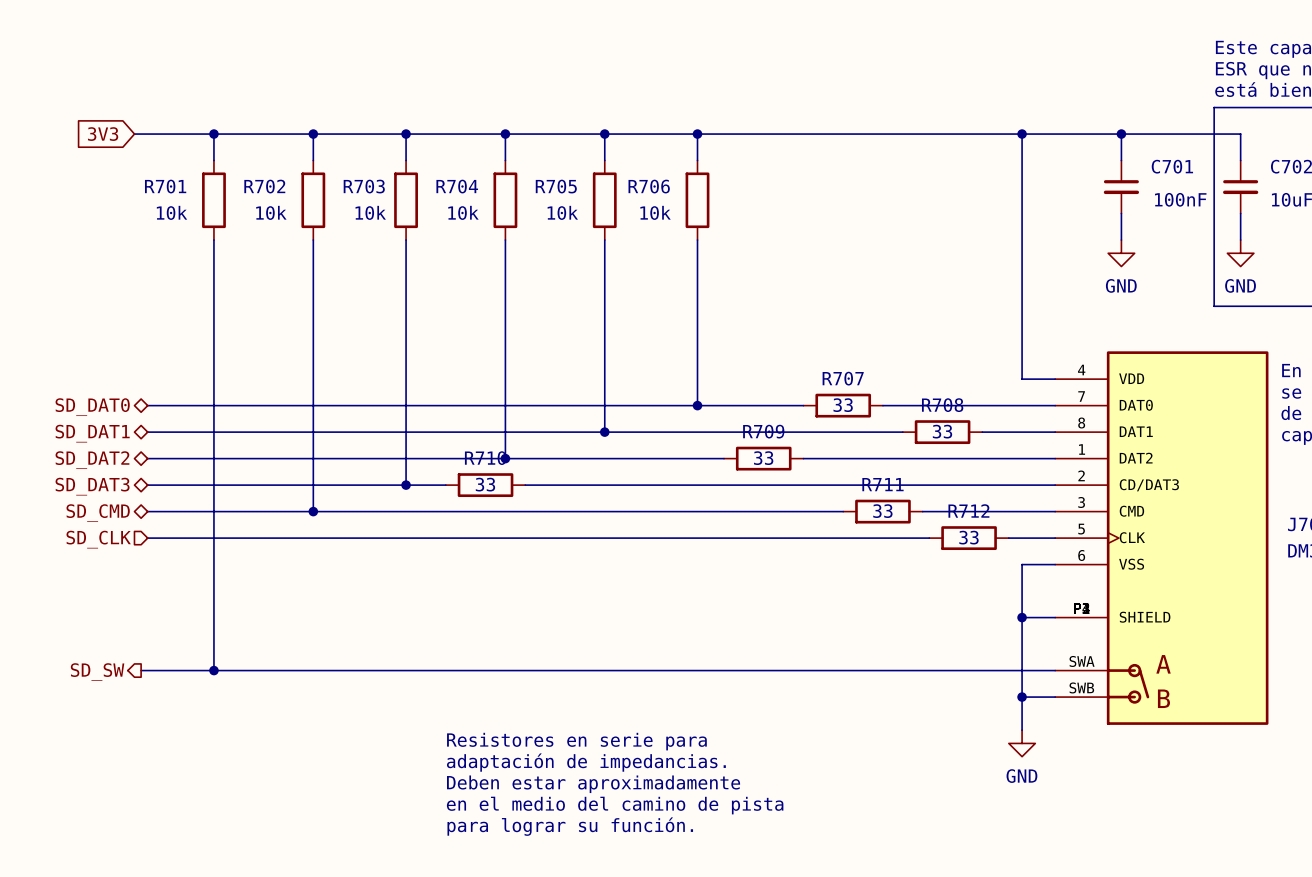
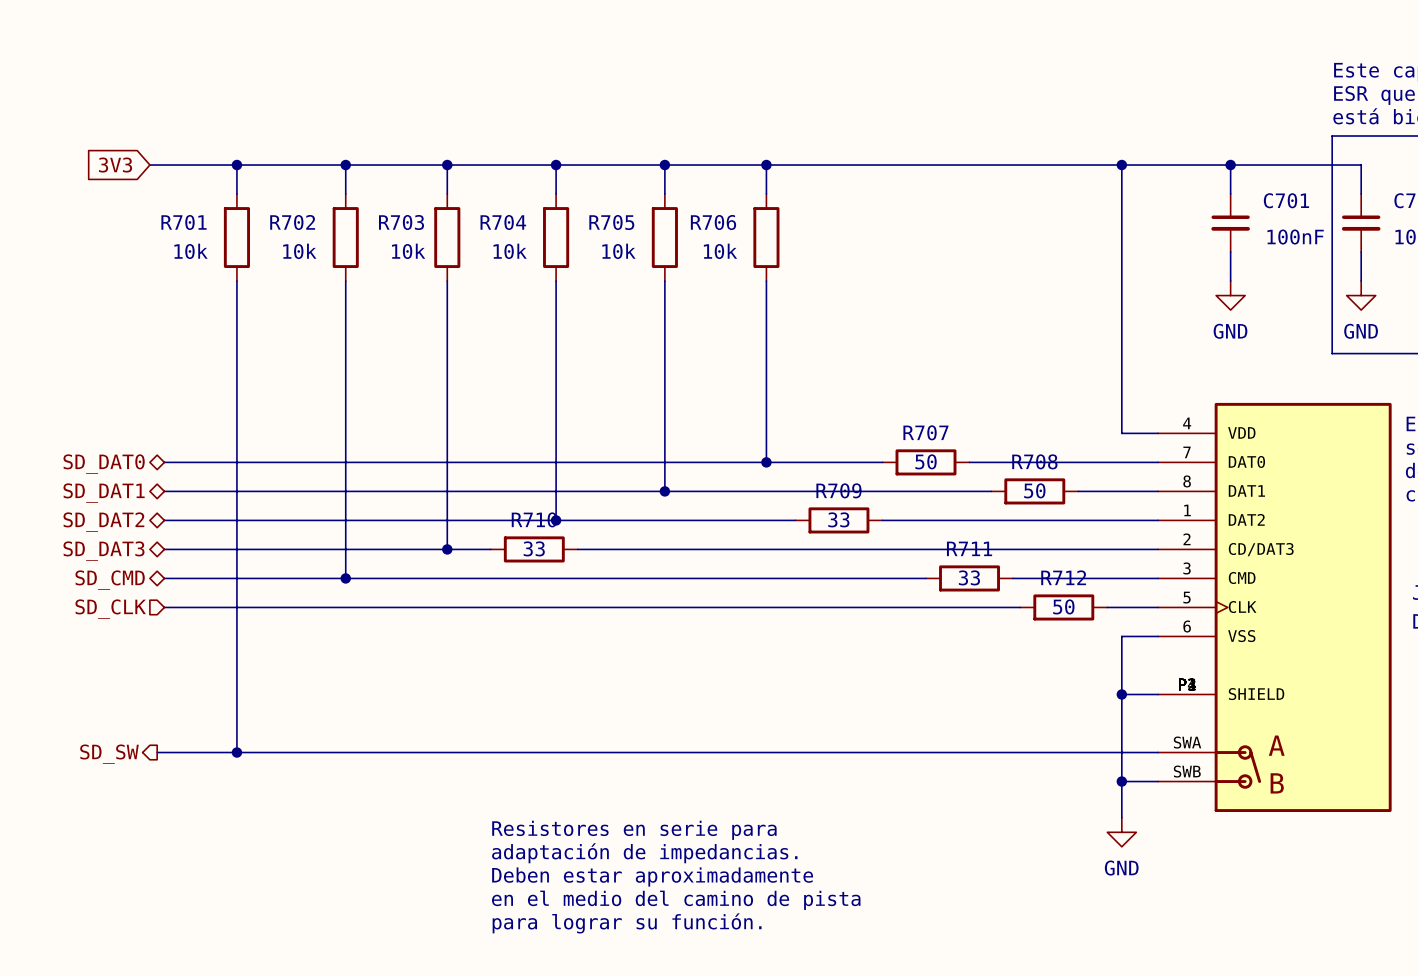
R707 value: 33 (843, 405) -> 50 (926, 461)
R708 value: 33 (942, 431) -> 50 (1034, 490)
R712 value: 33 (969, 537) -> 50 (1063, 606)

